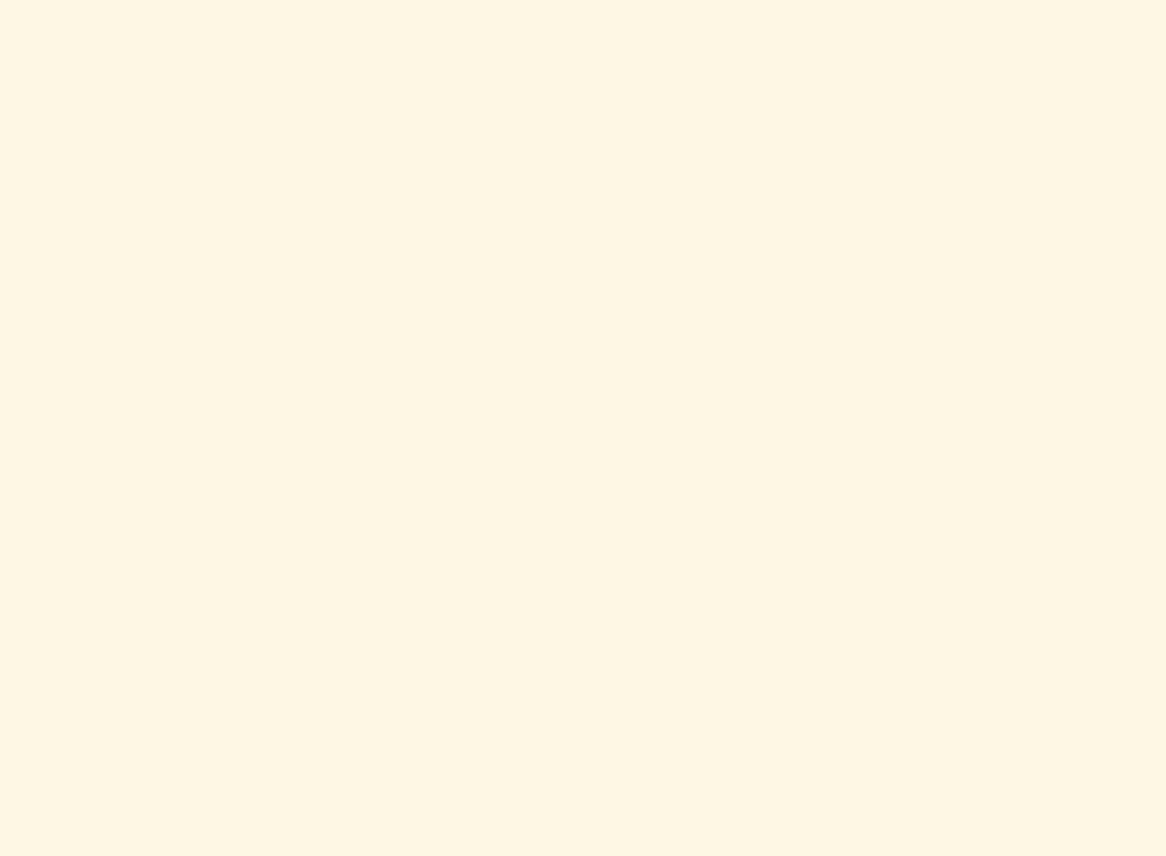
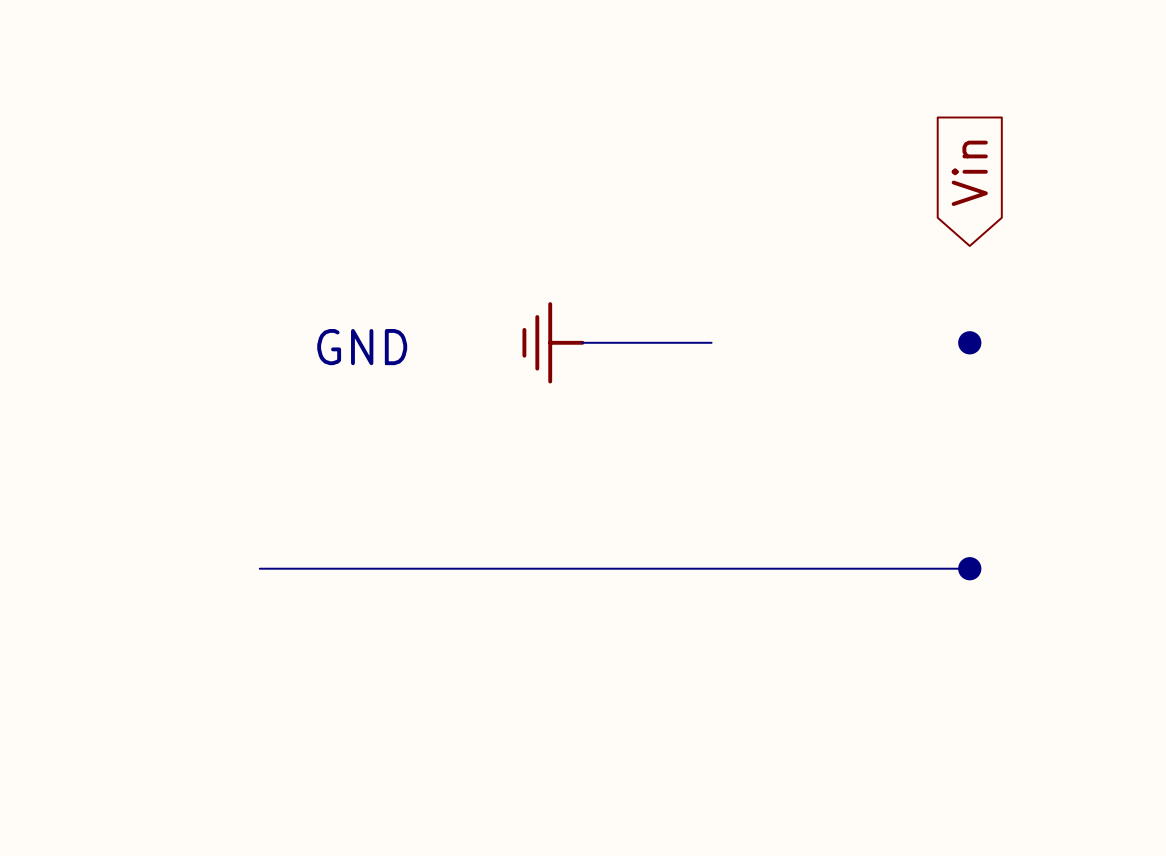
global label: none -> Vin (969, 173)
power symbol: none -> GND (553, 342)
wire: none -> (582, 342) (711, 342)
junction: none -> (969, 342)
wire: none -> (259, 568) (969, 568)
junction: none -> (969, 568)

